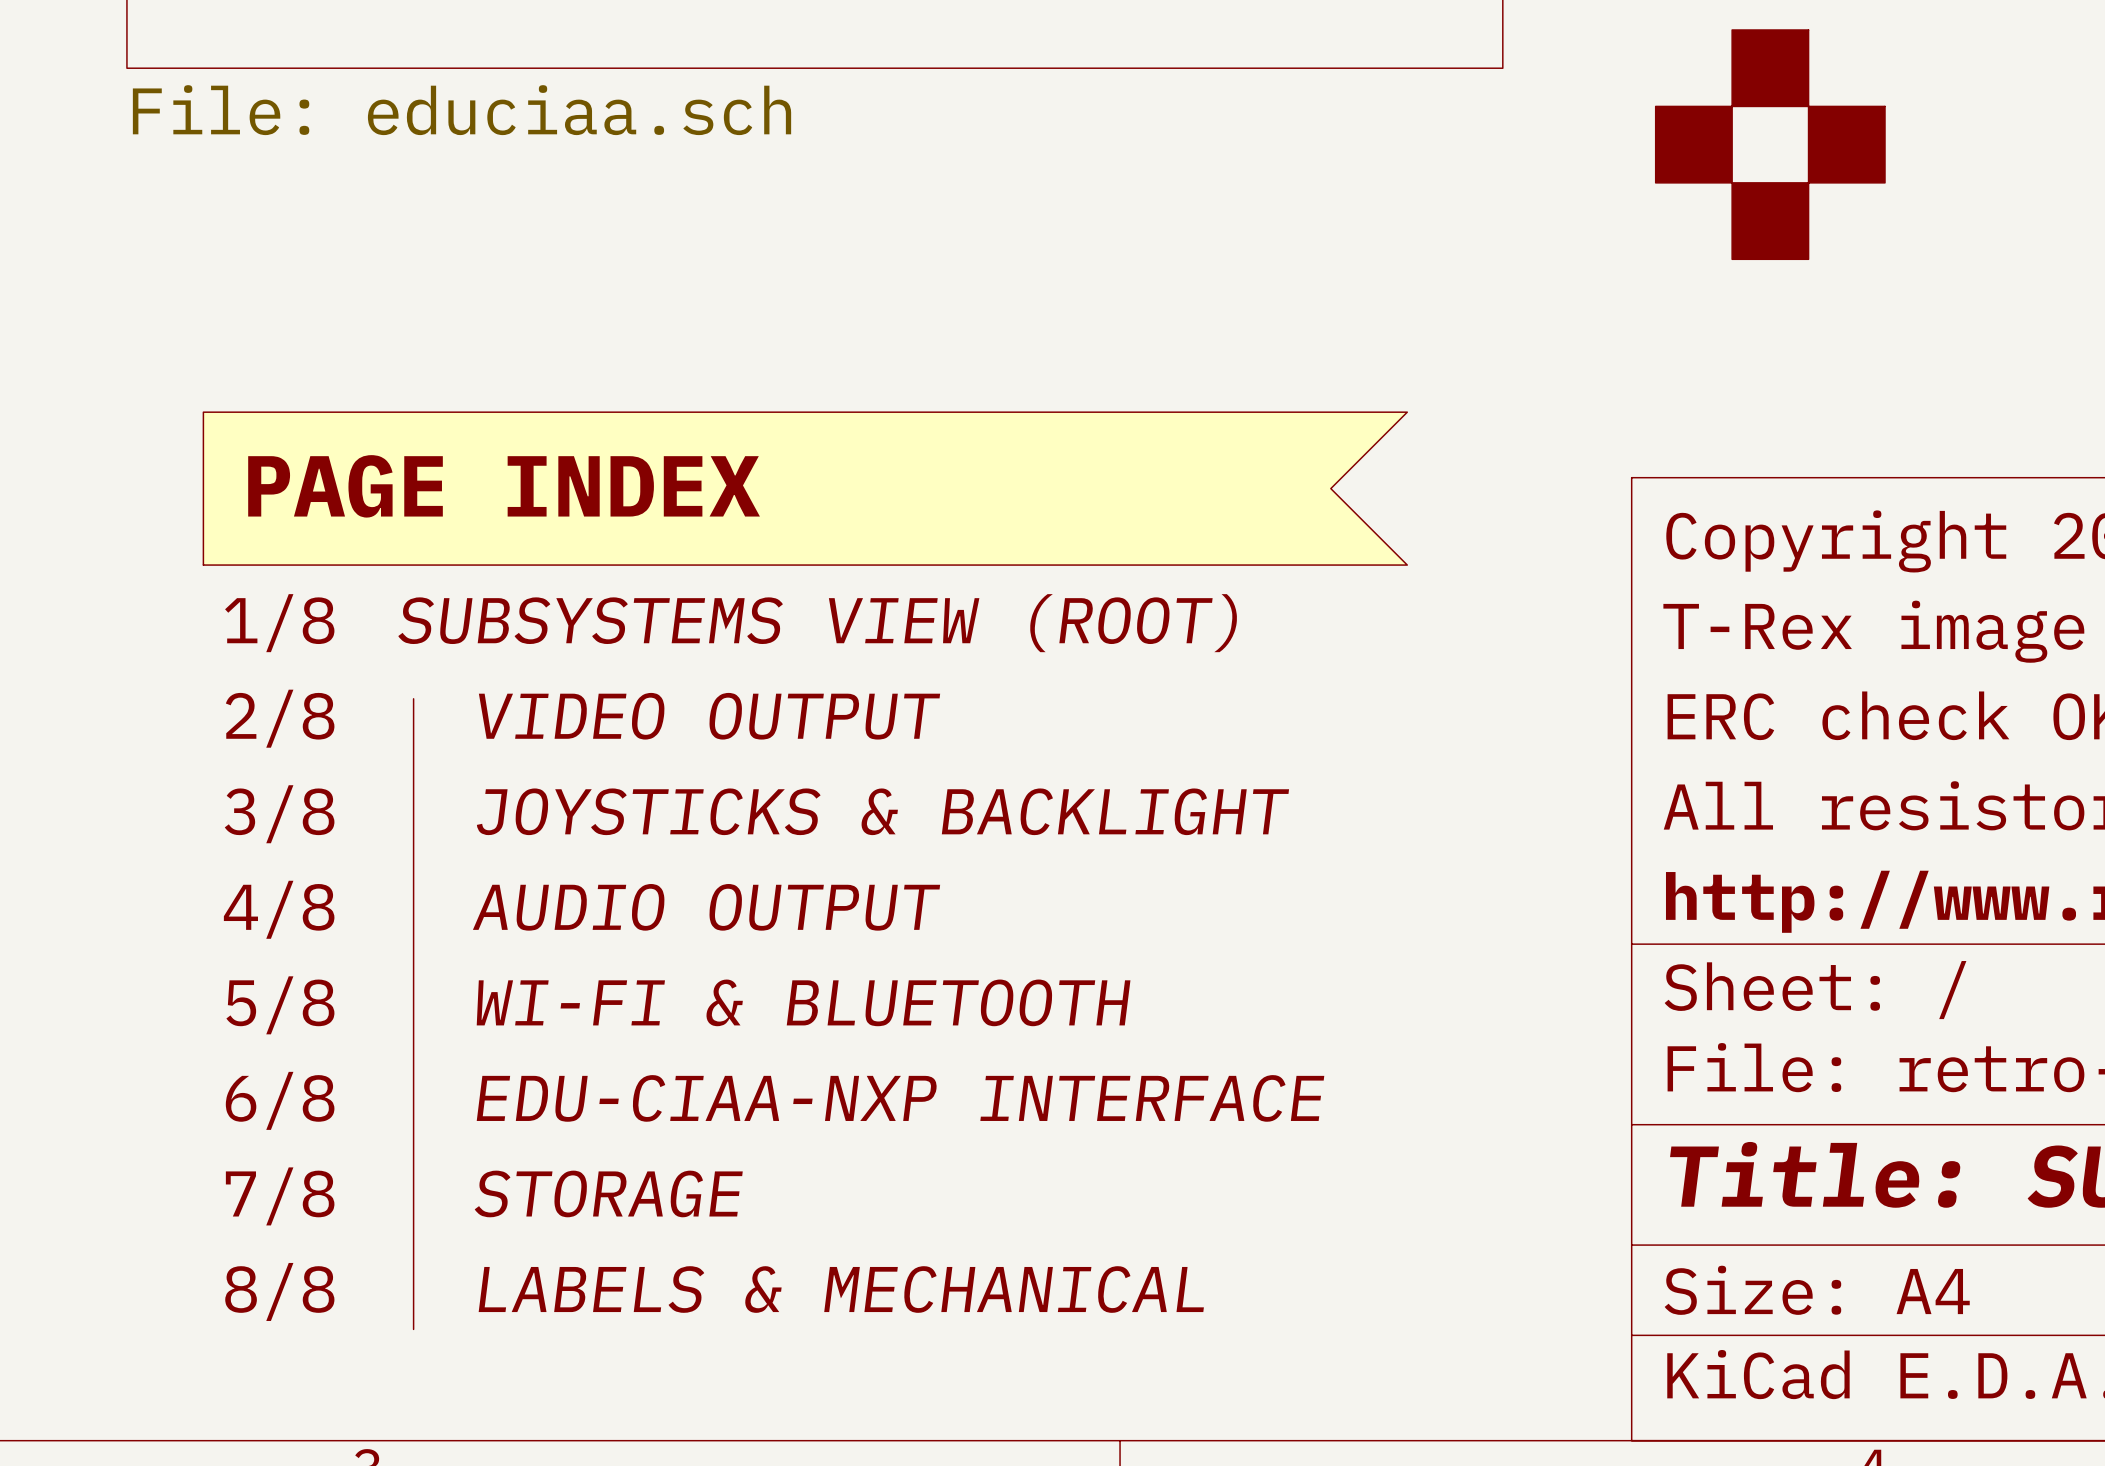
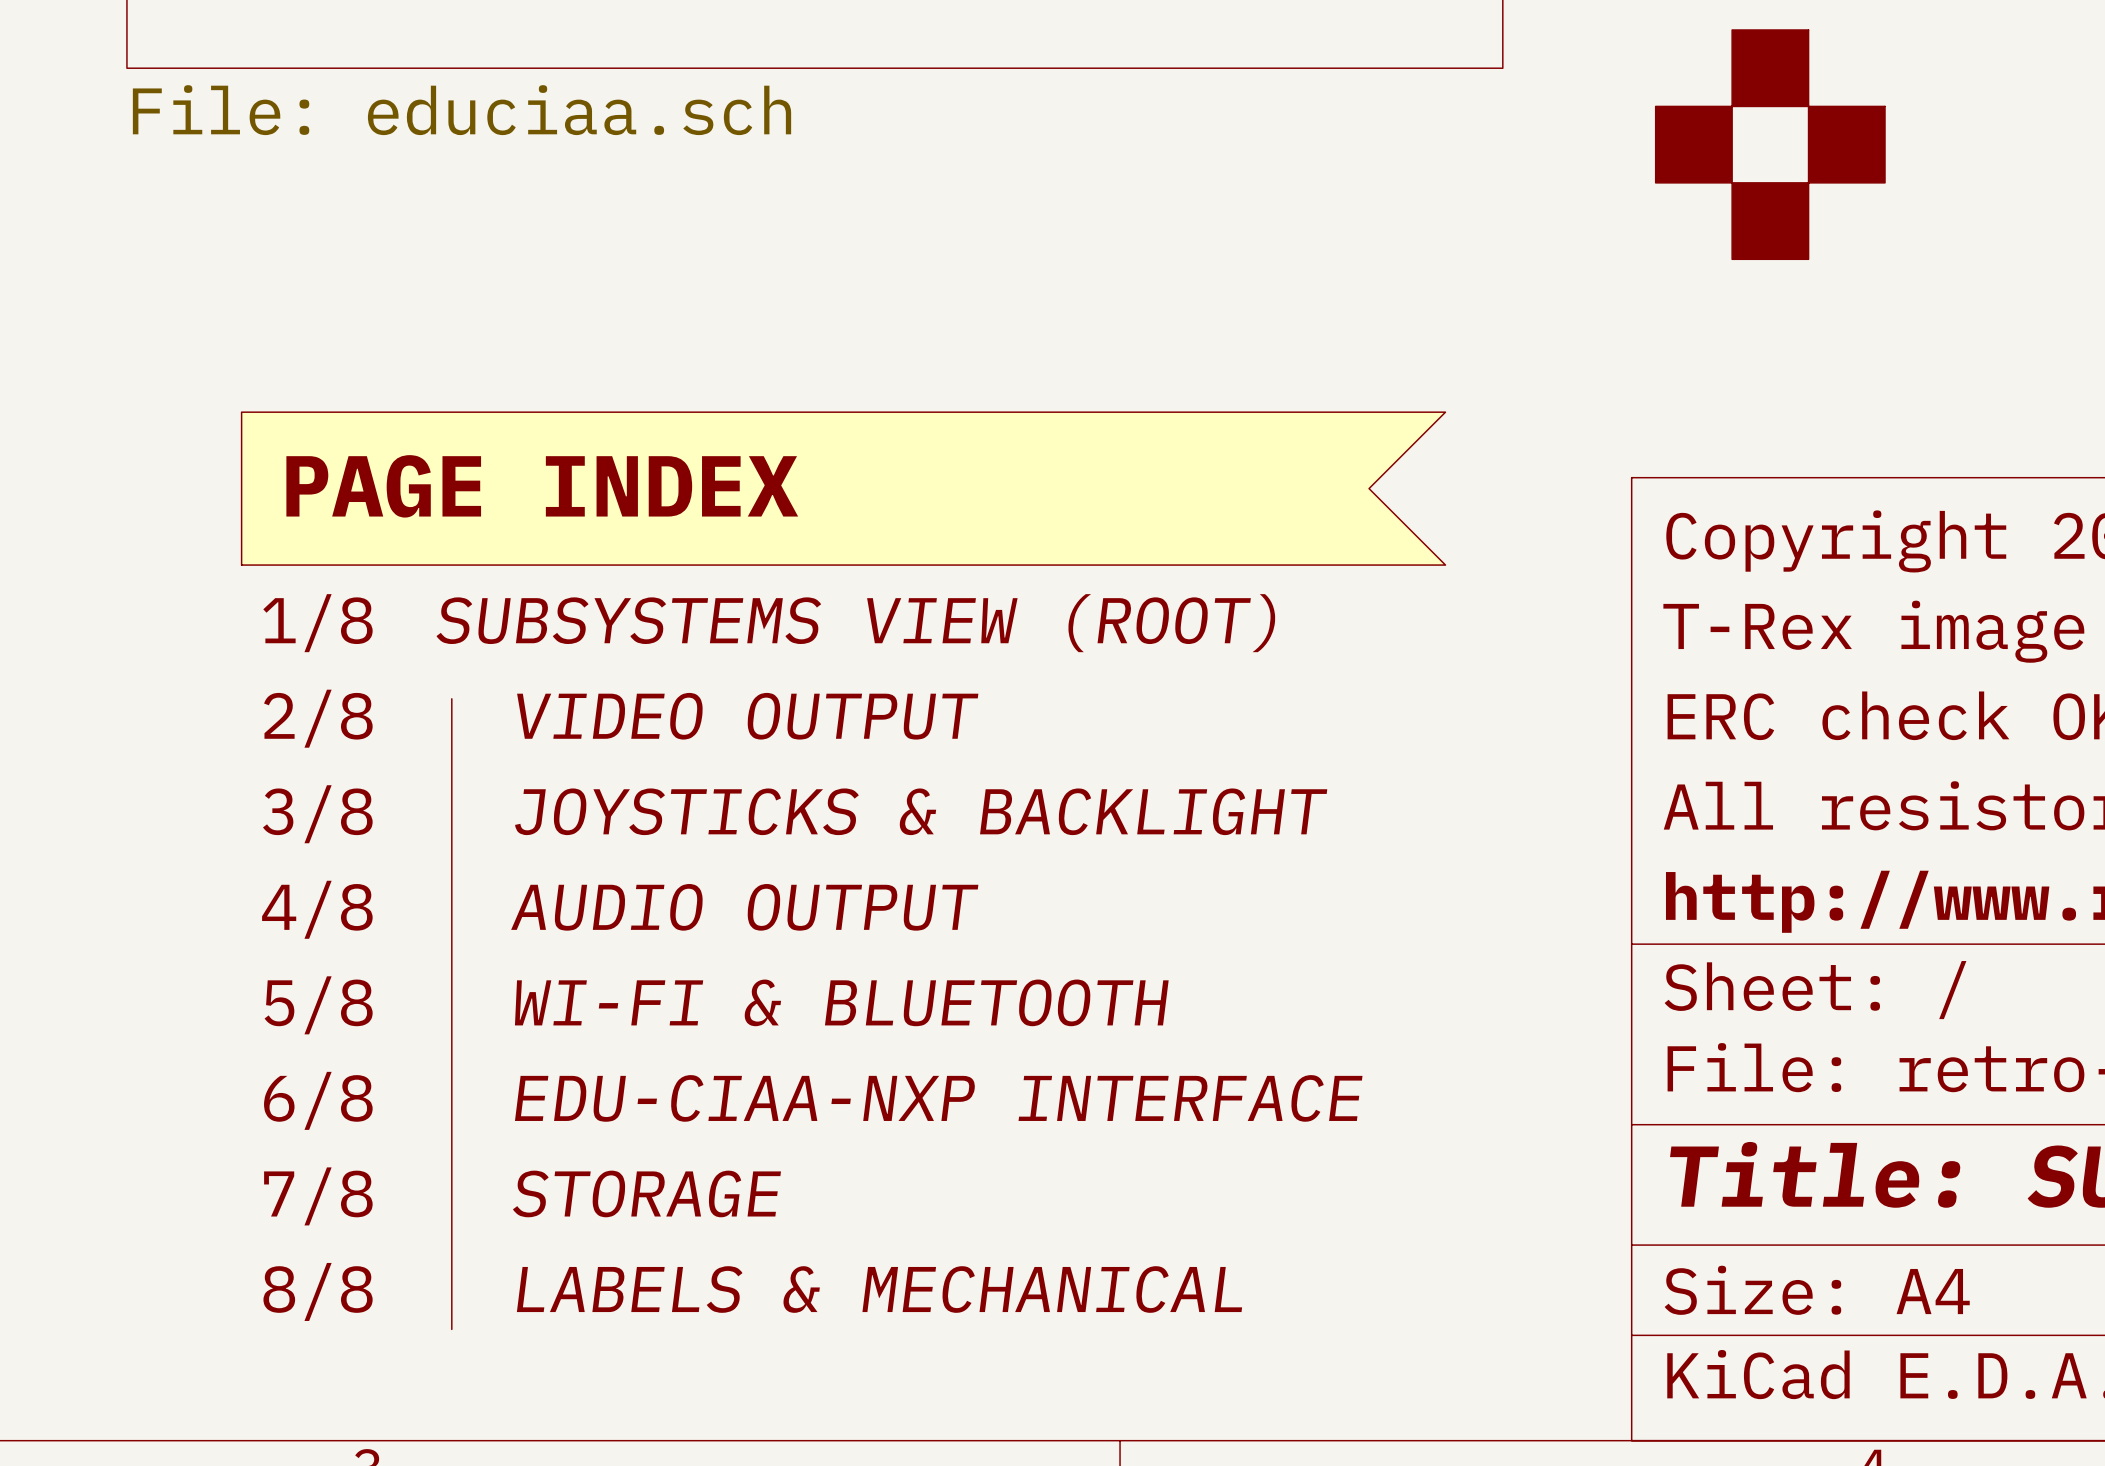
power symbol position: (805, 870) -> (843, 870)

